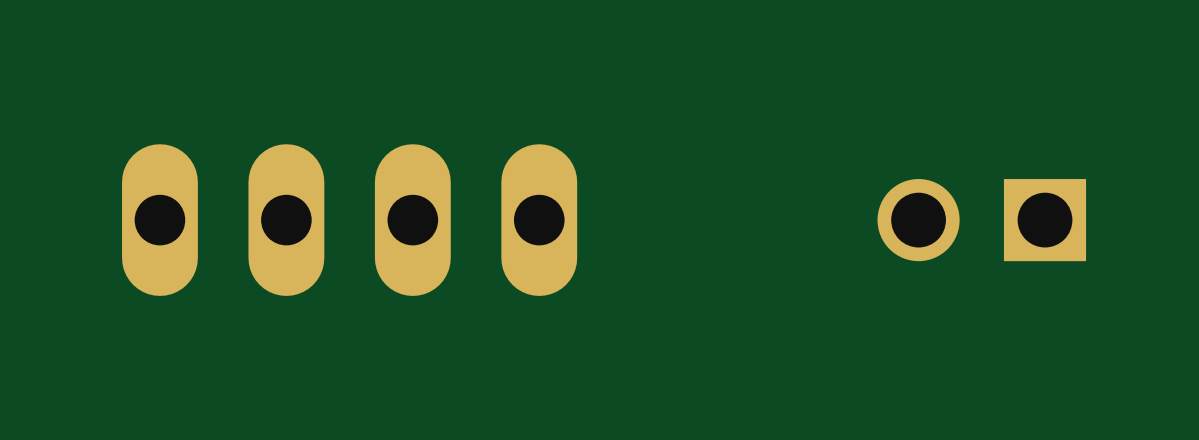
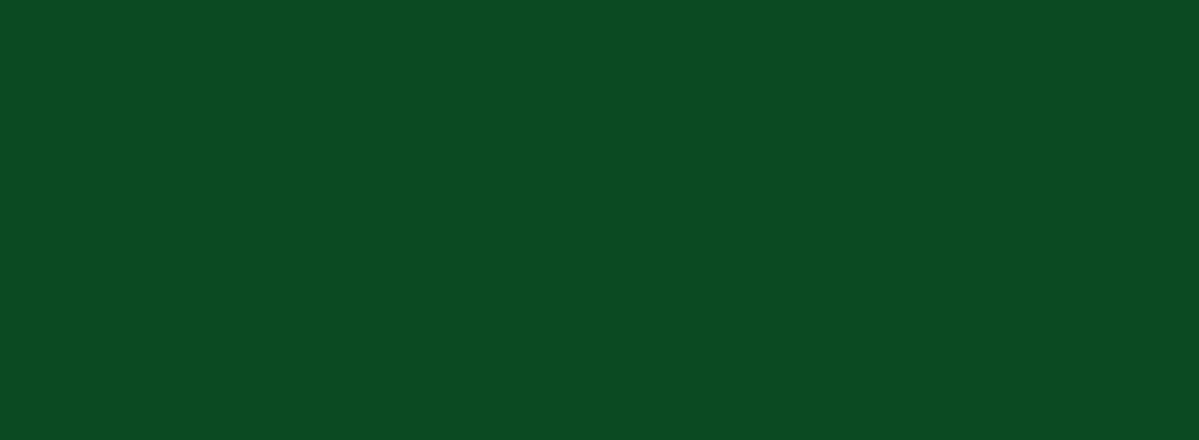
part: (349, 220) -> none
part: (981, 220) -> none

